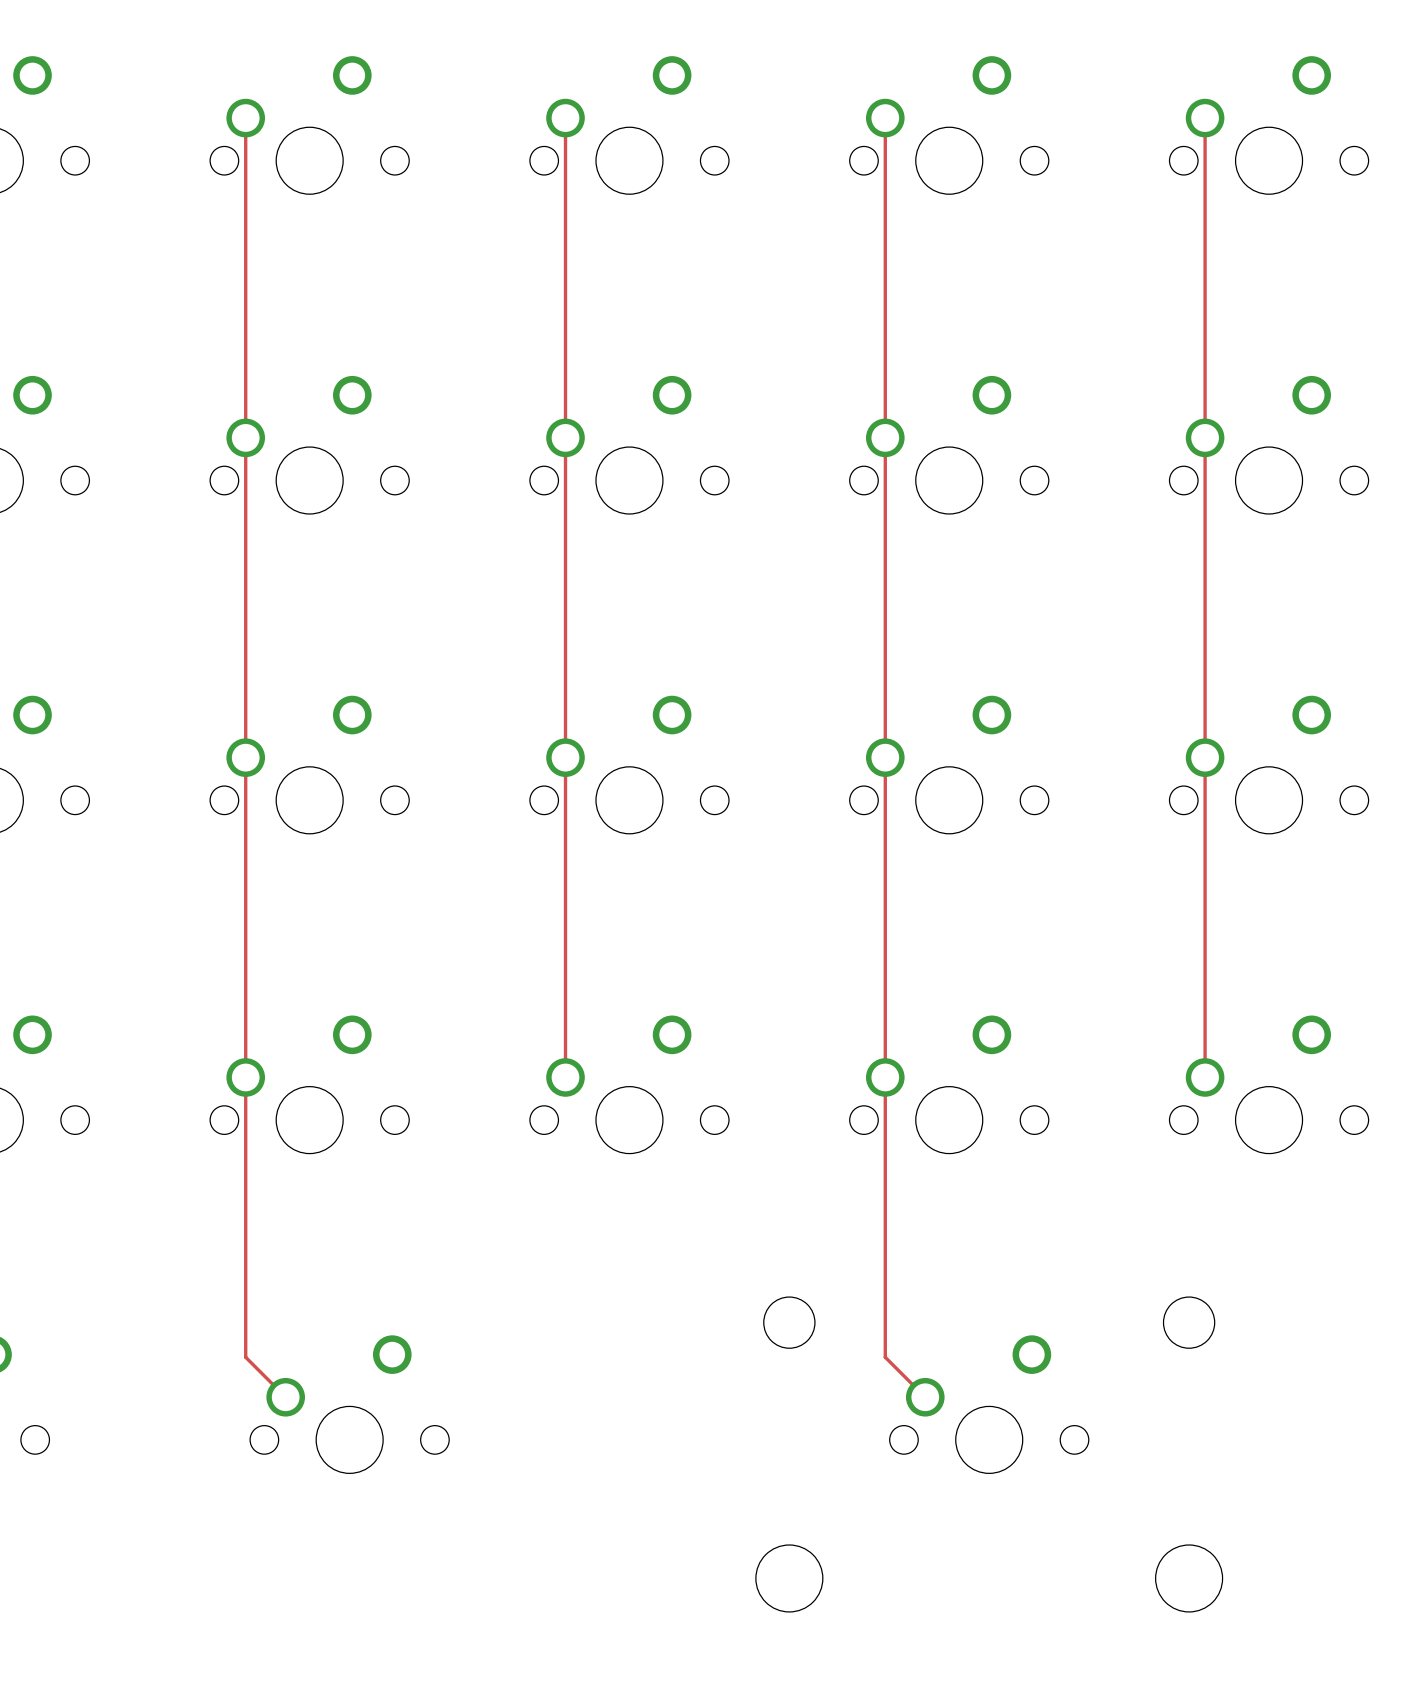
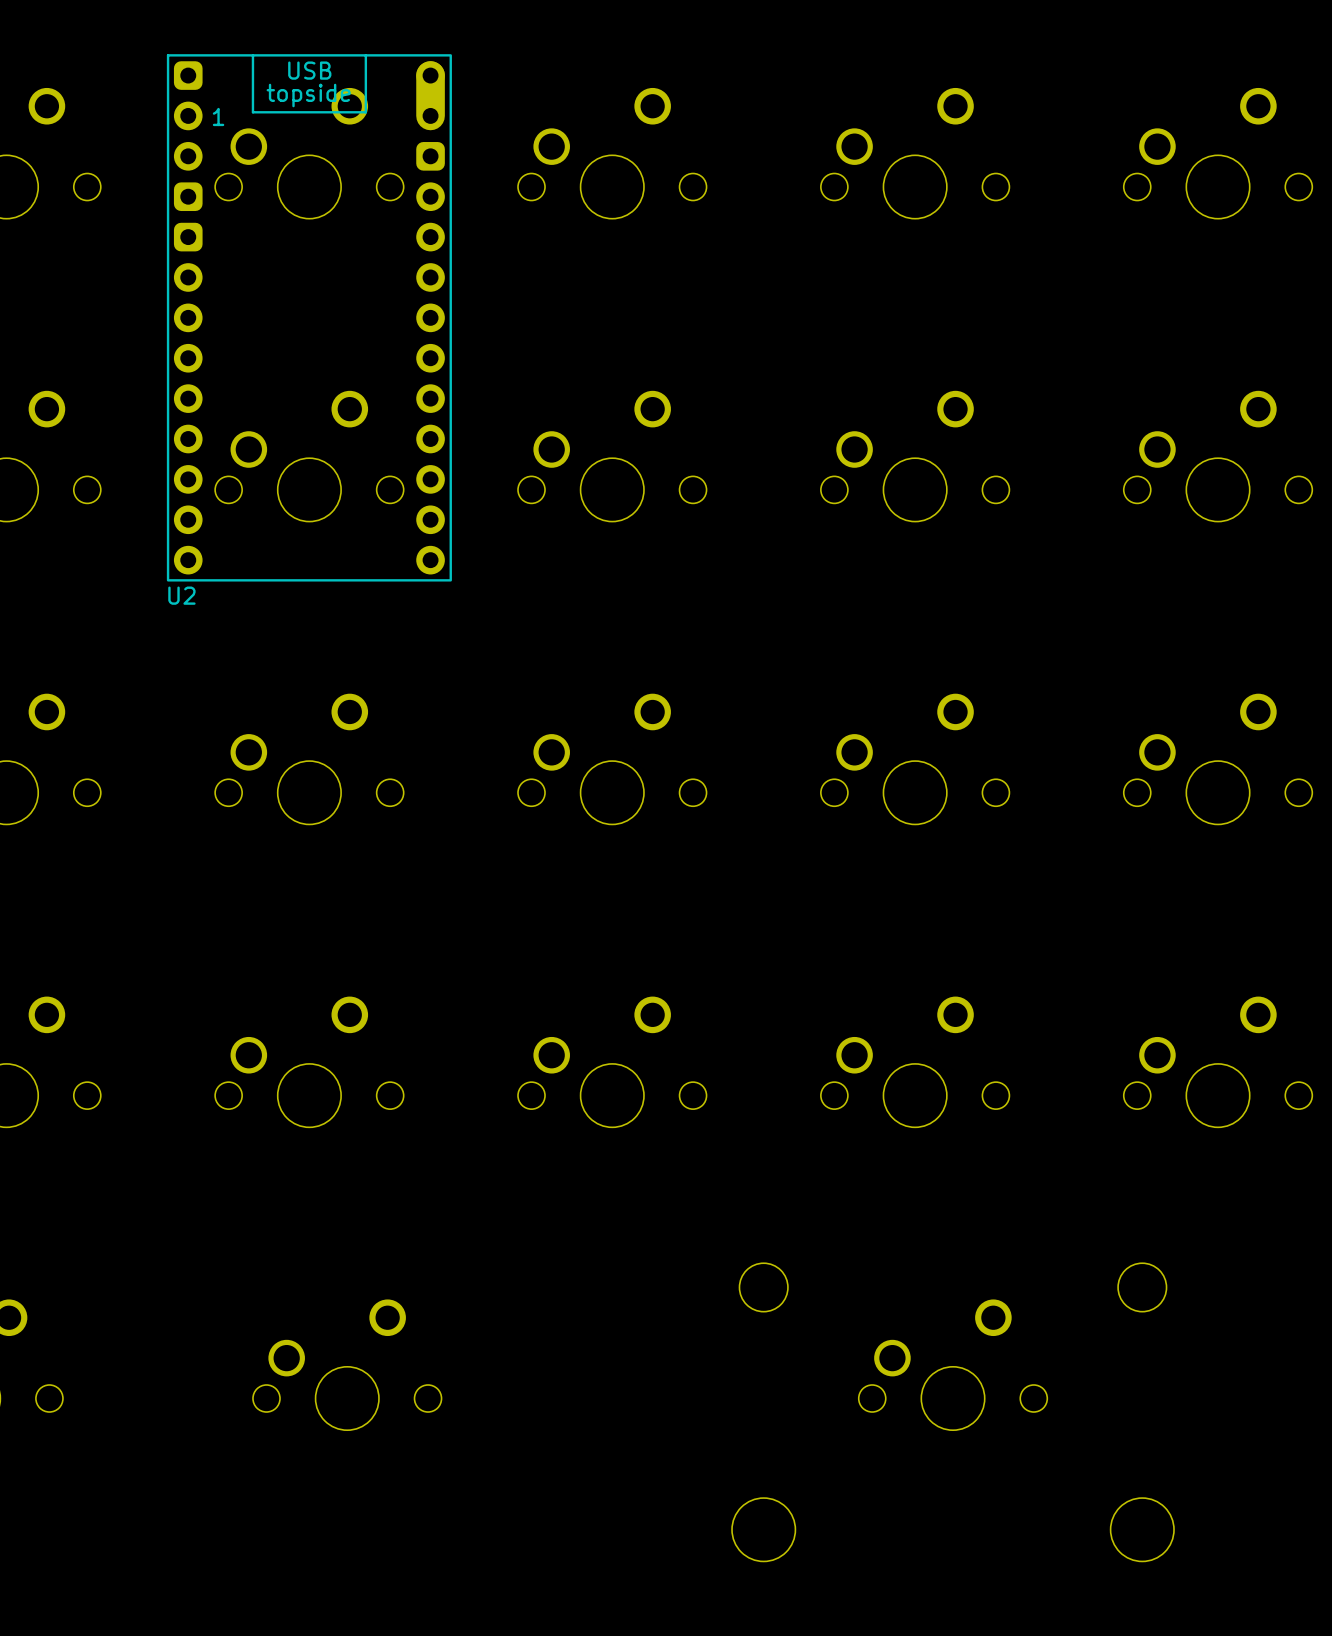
track: (245, 118) (245, 1357) (285, 1397) -> none
track: (565, 118) (565, 1077) -> none
track: (885, 118) (885, 1357) (925, 1397) -> none
track: (1205, 118) (1205, 1077) -> none
U2: none -> (309, 317)

